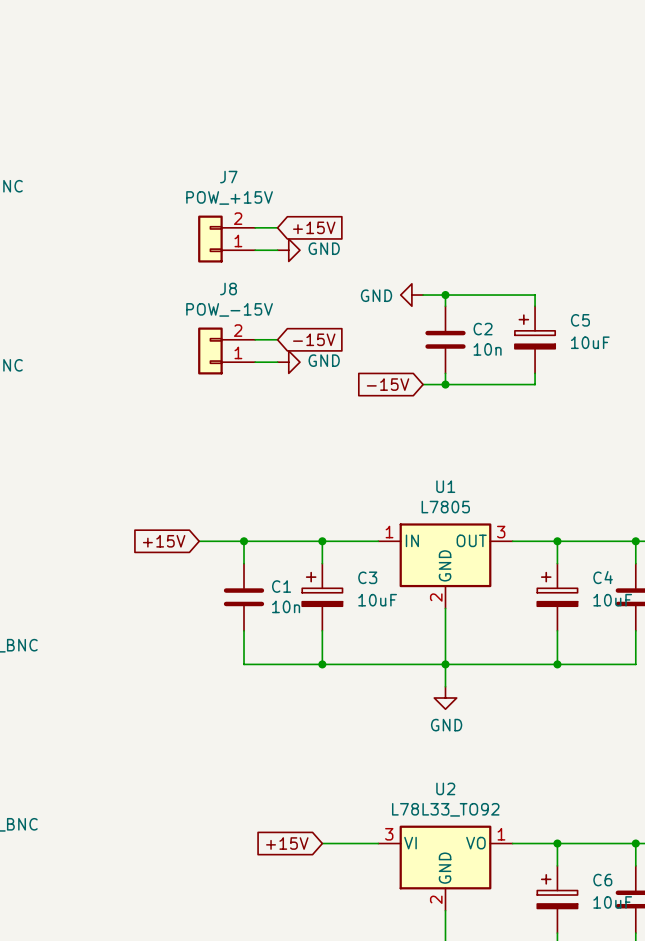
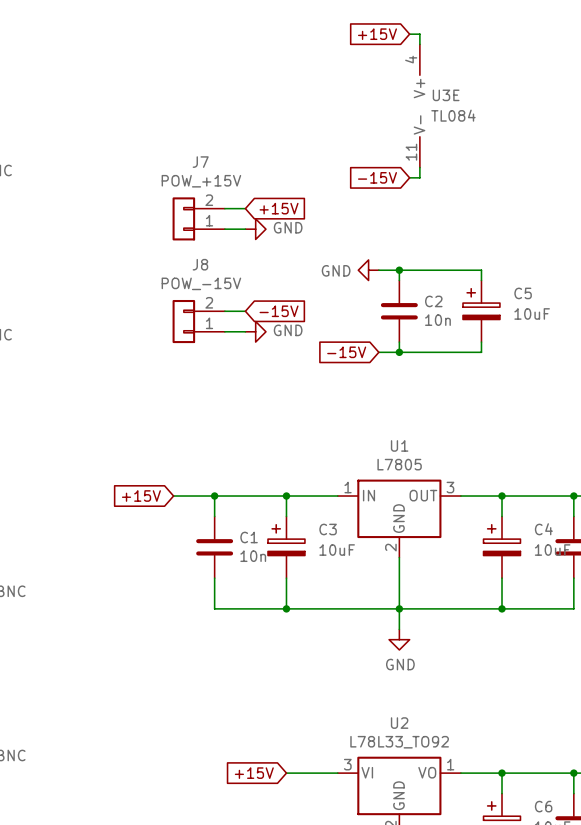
global label: none -> +15V (377, 34)
wire: none -> (409, 34) (419, 34) (419, 44)
U3E: none -> TL084 (419, 106)
wire: none -> (419, 167) (419, 177) (409, 177)
global label: none -> -15V (377, 177)

